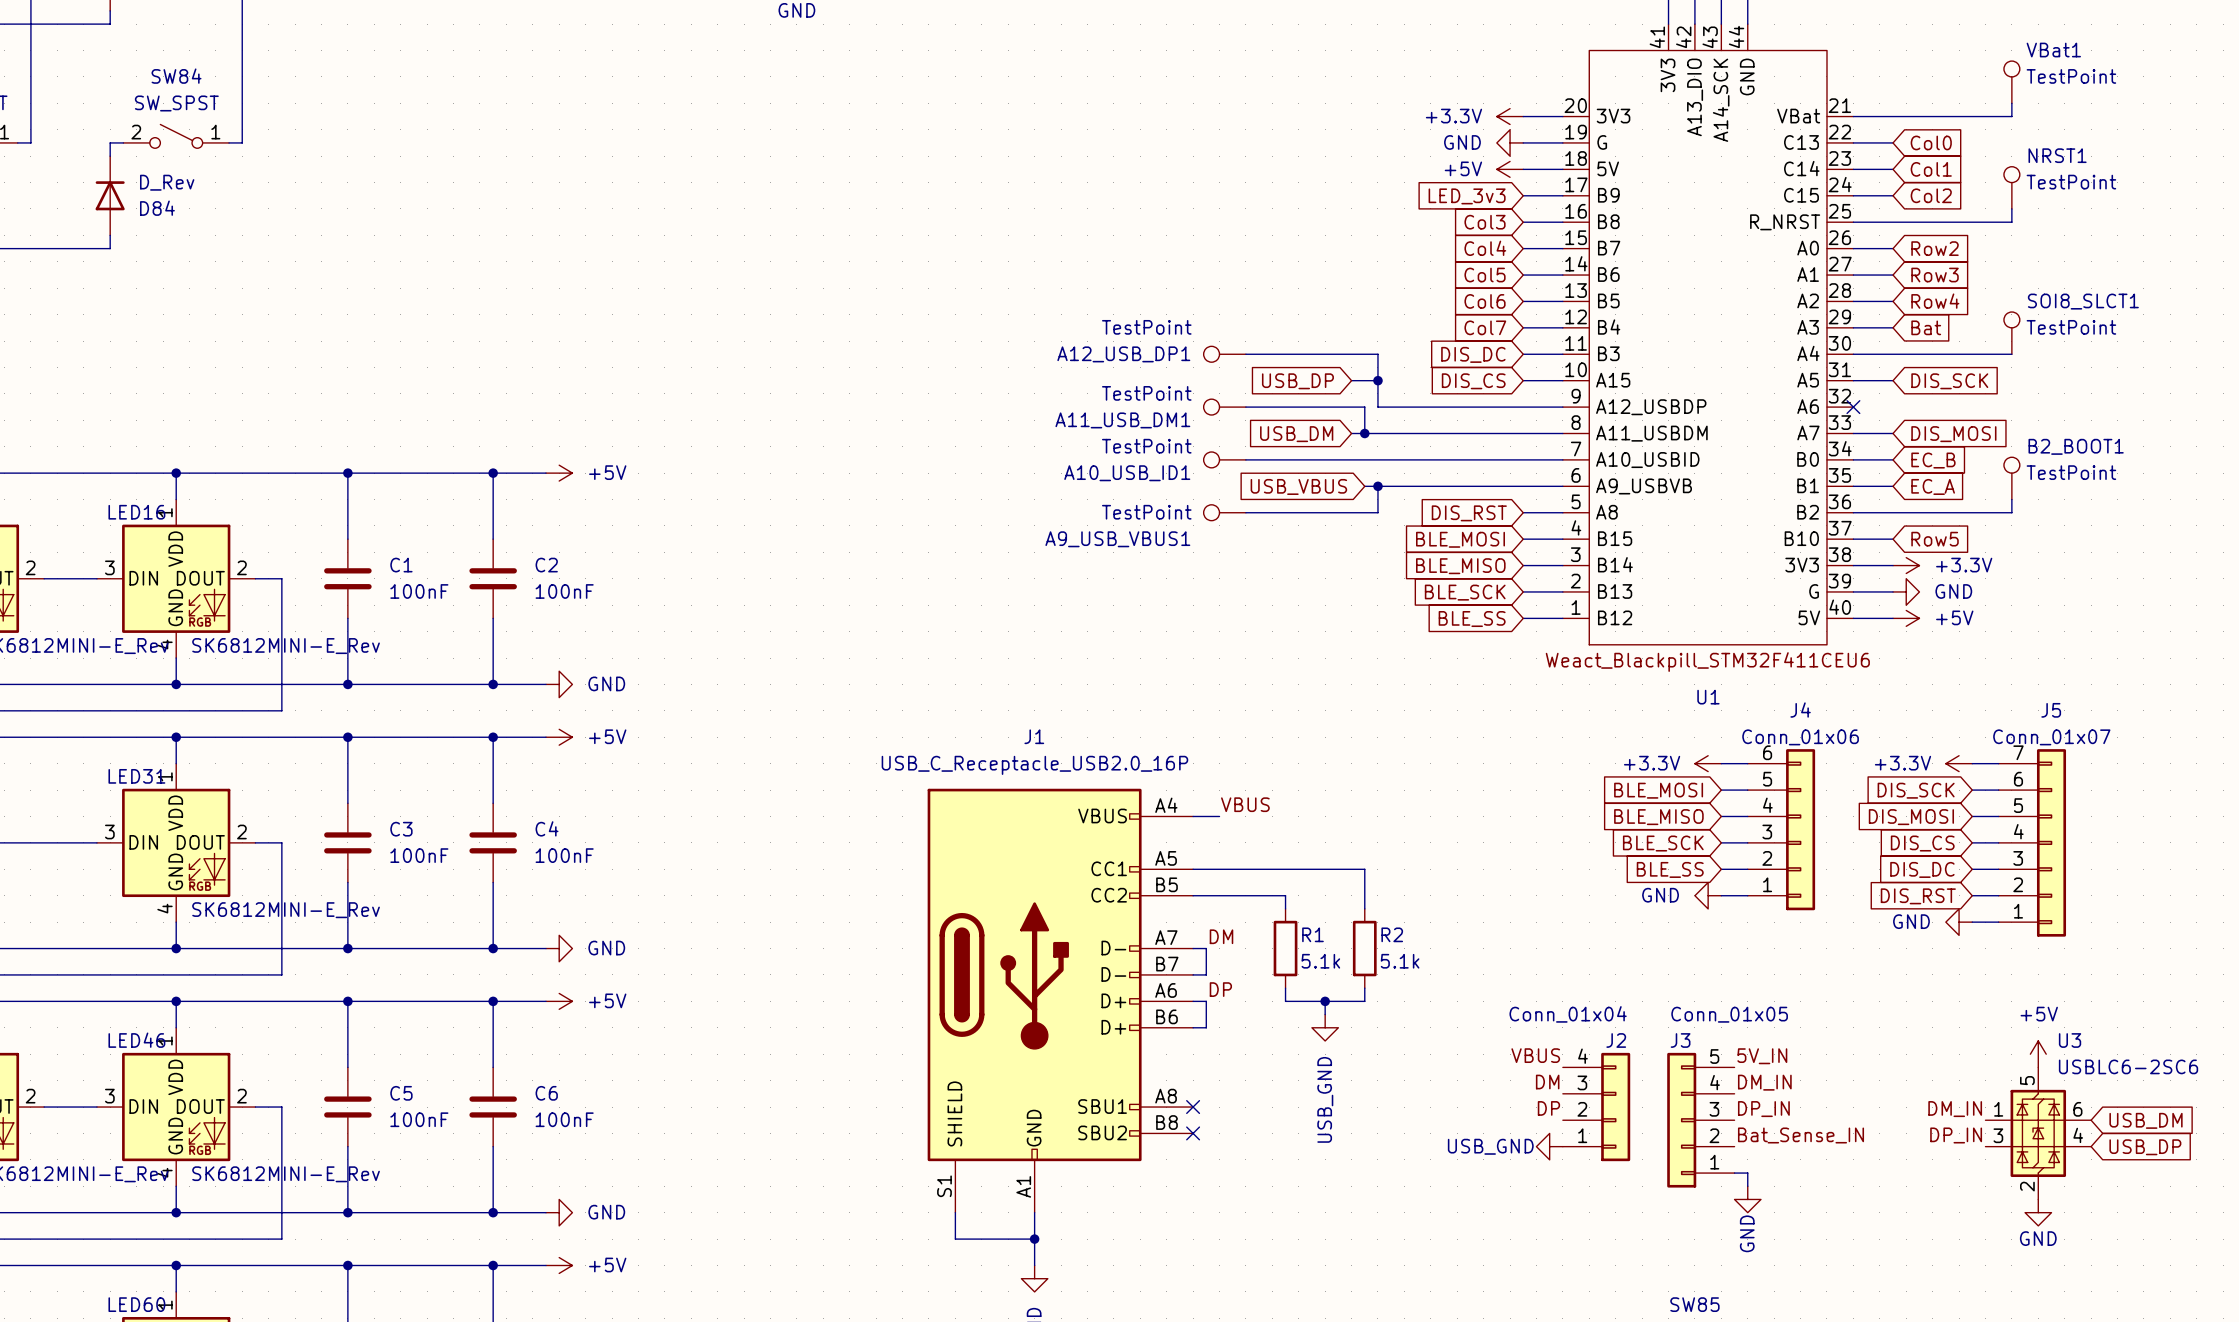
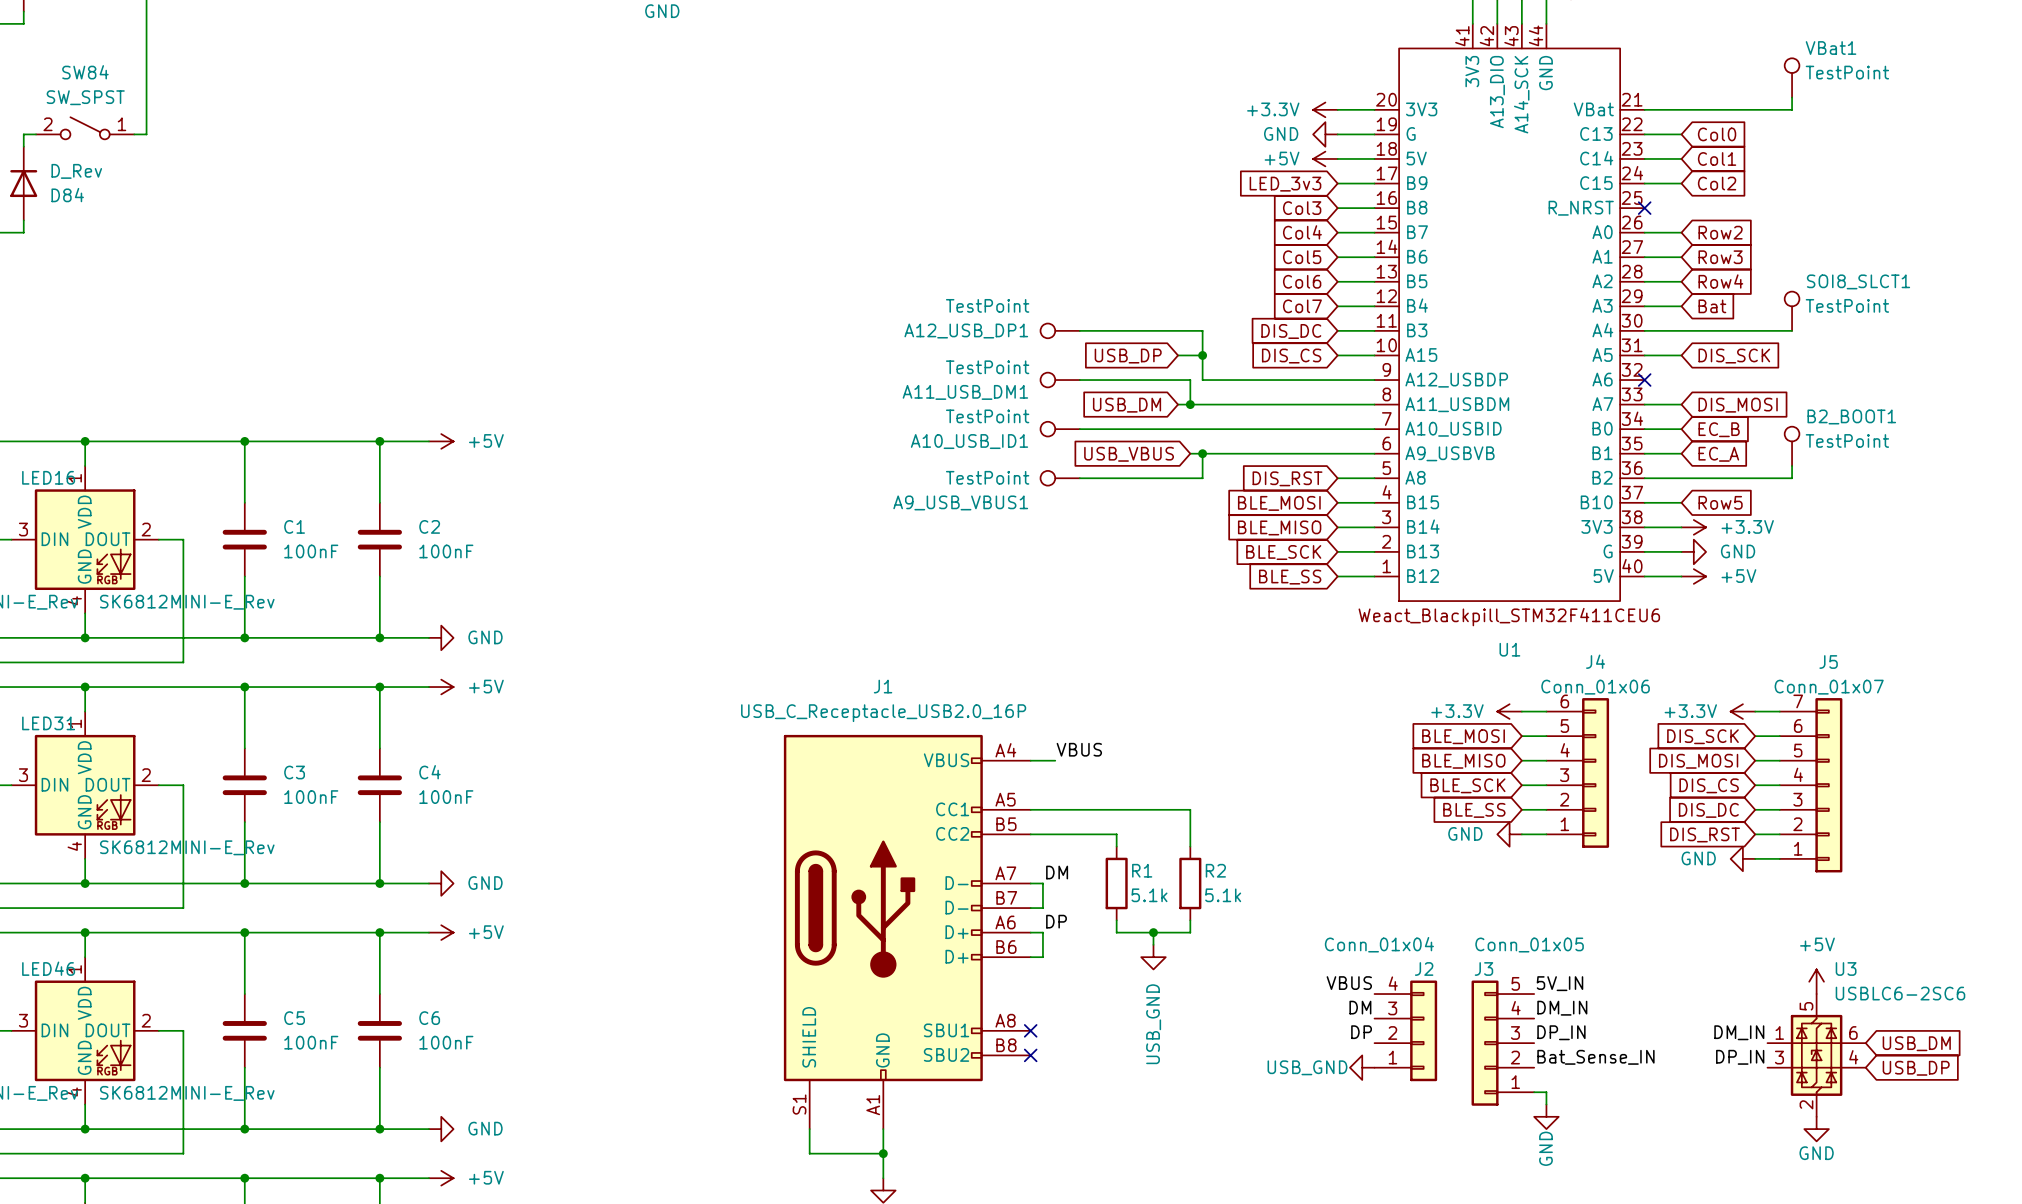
NRST1: TestPoint (2011, 187) -> none
wire: (2011, 208) (2011, 222) (1853, 222) -> none
no-connect mark: none -> (1644, 208)

